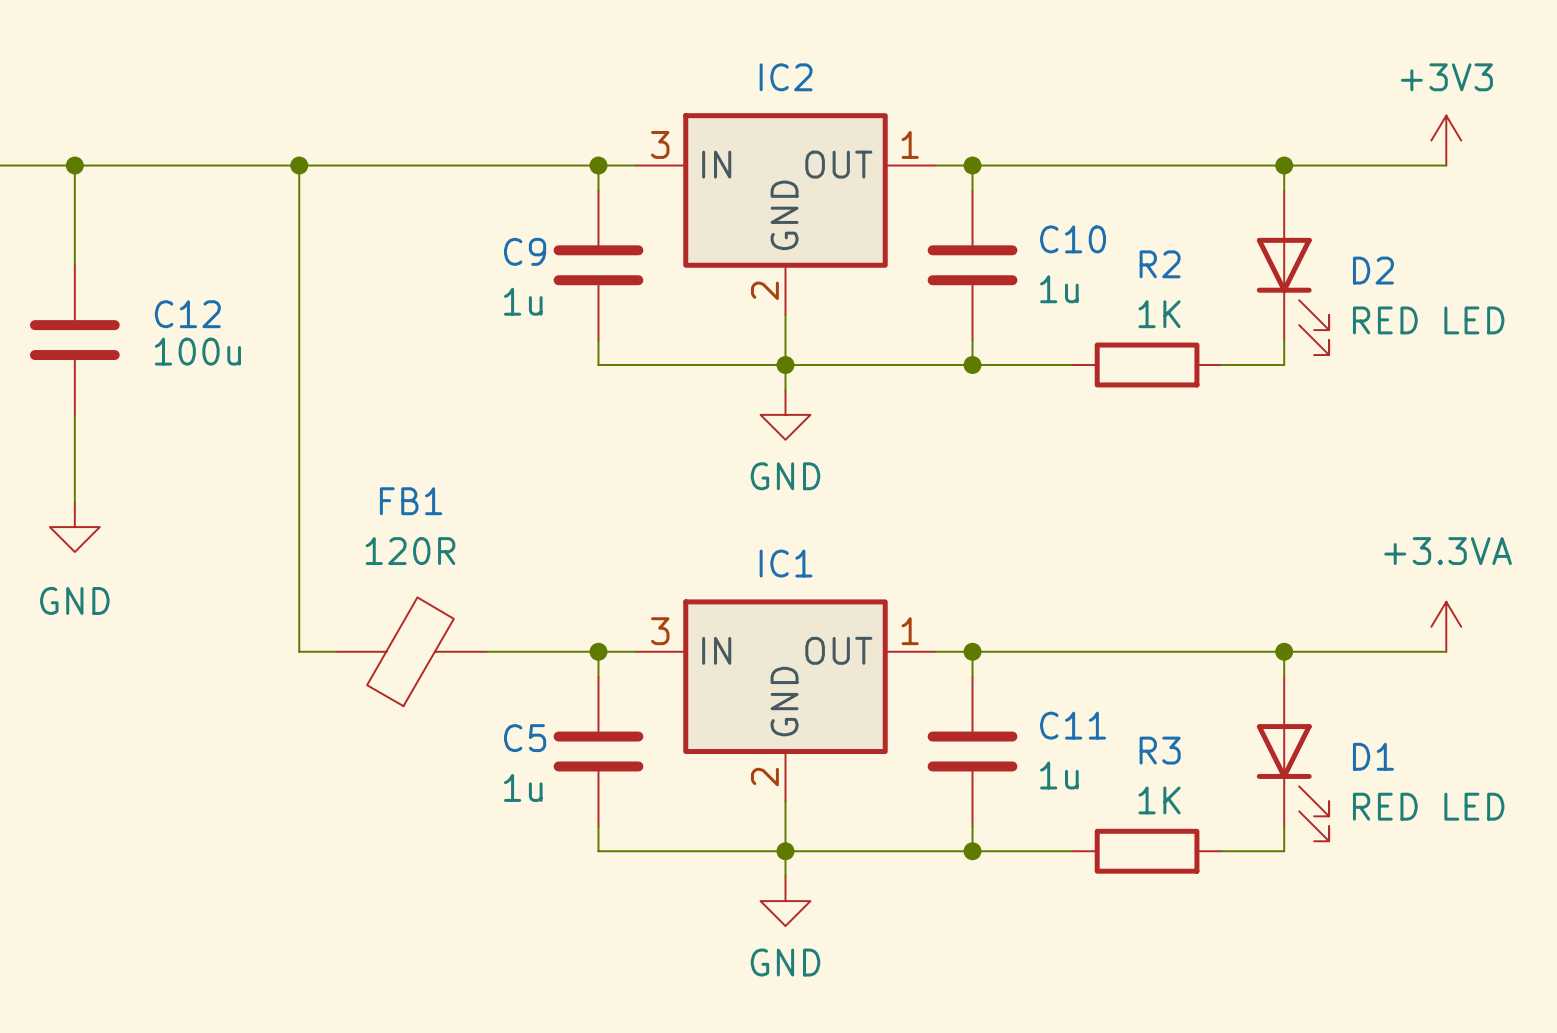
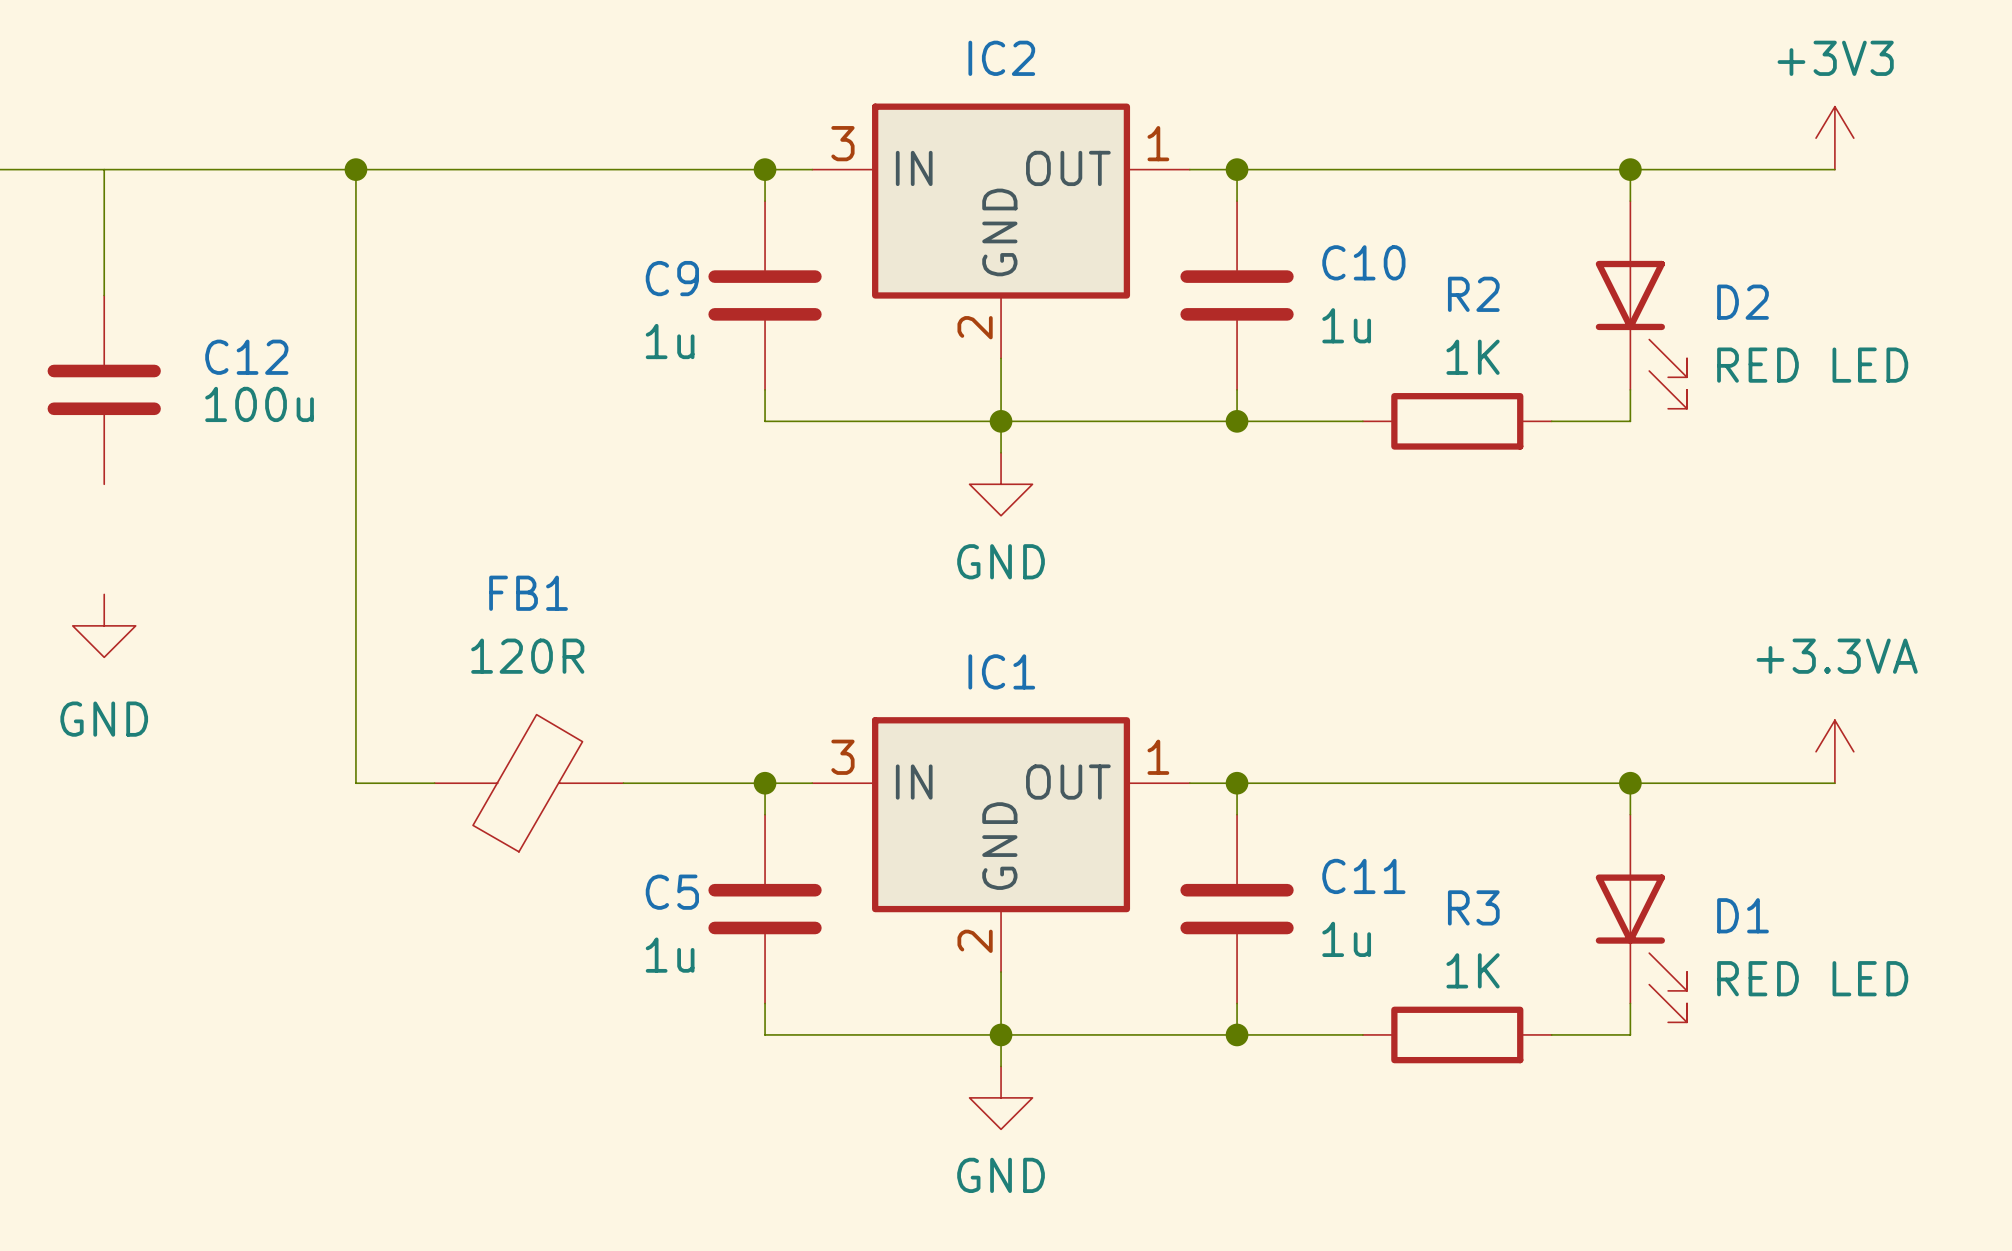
junction: (74, 165) -> none
wire: (299, 165) (299, 651) -> (355, 169) (355, 783) (387, 783)
junction position: (299, 165) -> (355, 169)
wire: (74, 414) (74, 502) -> none

